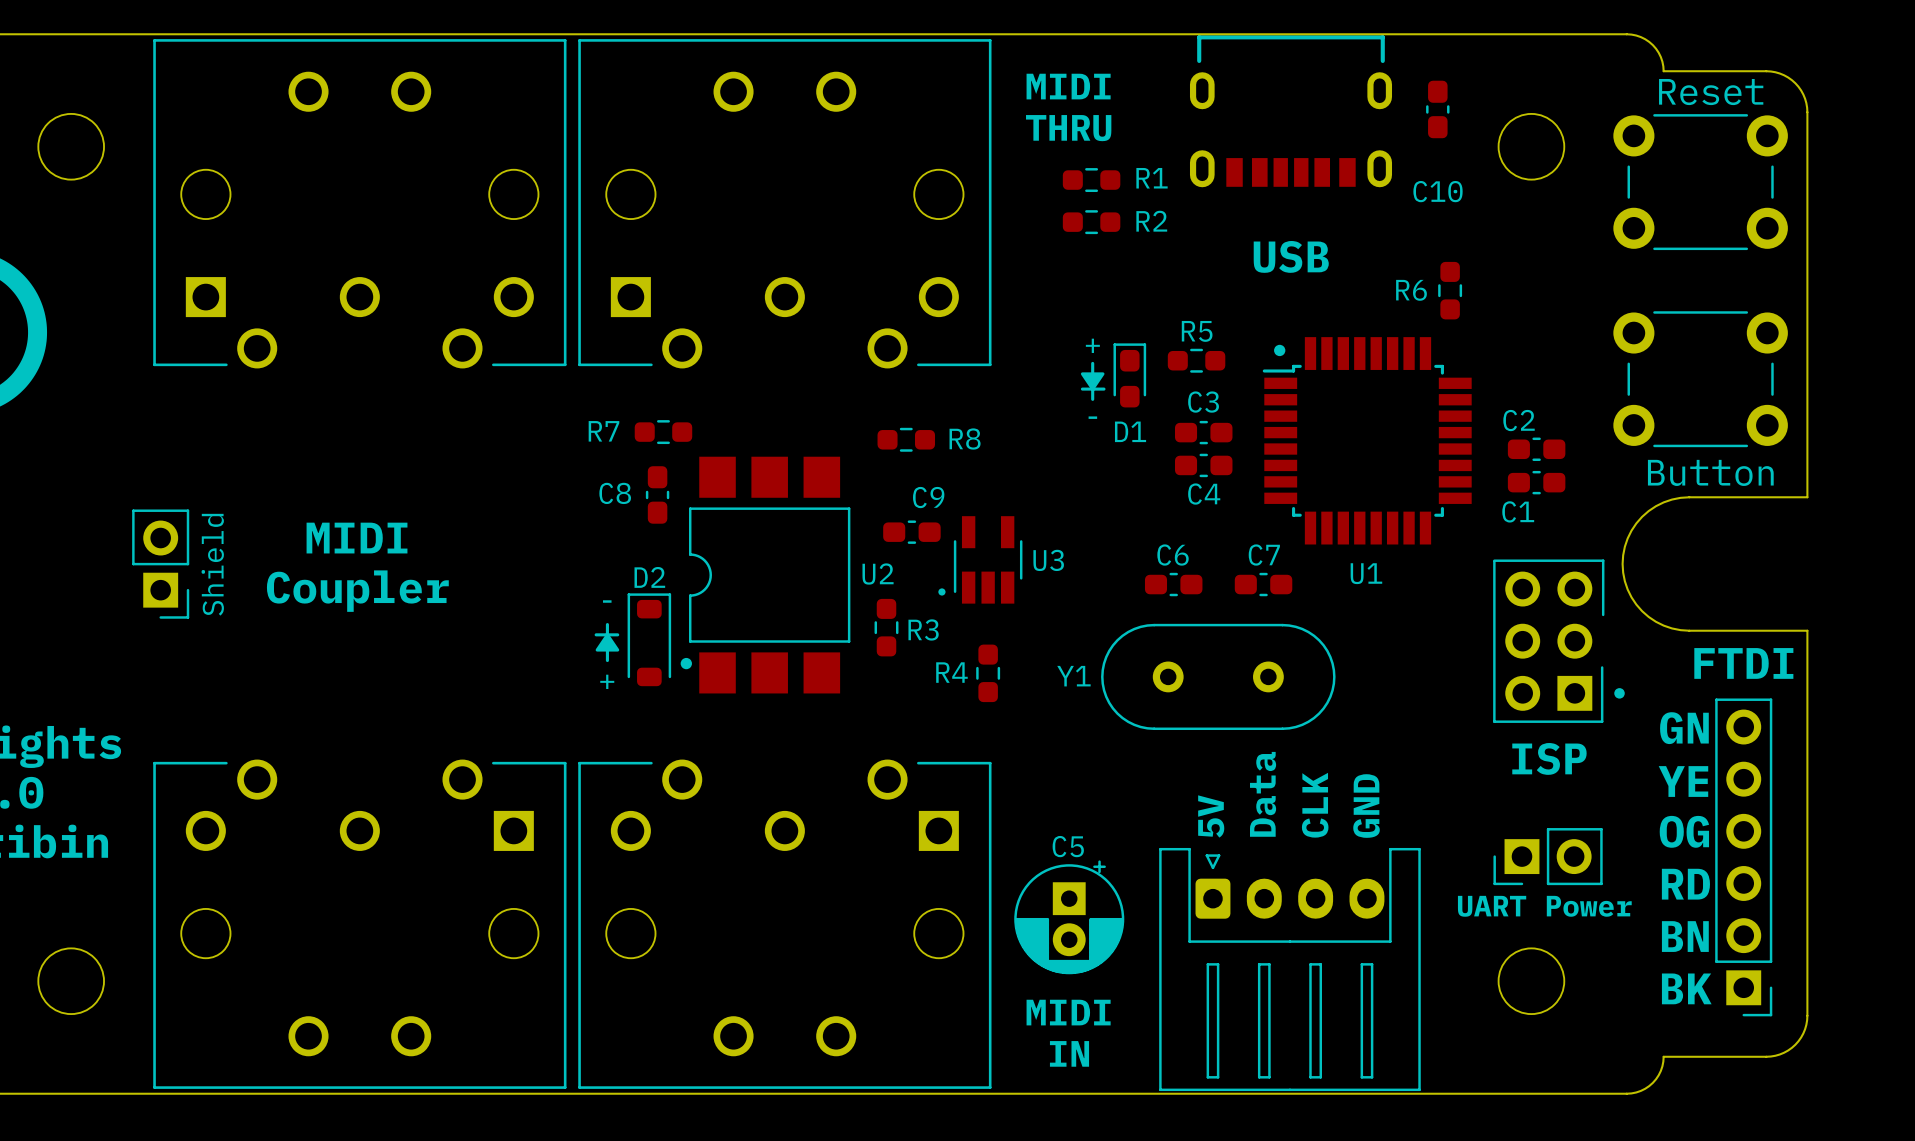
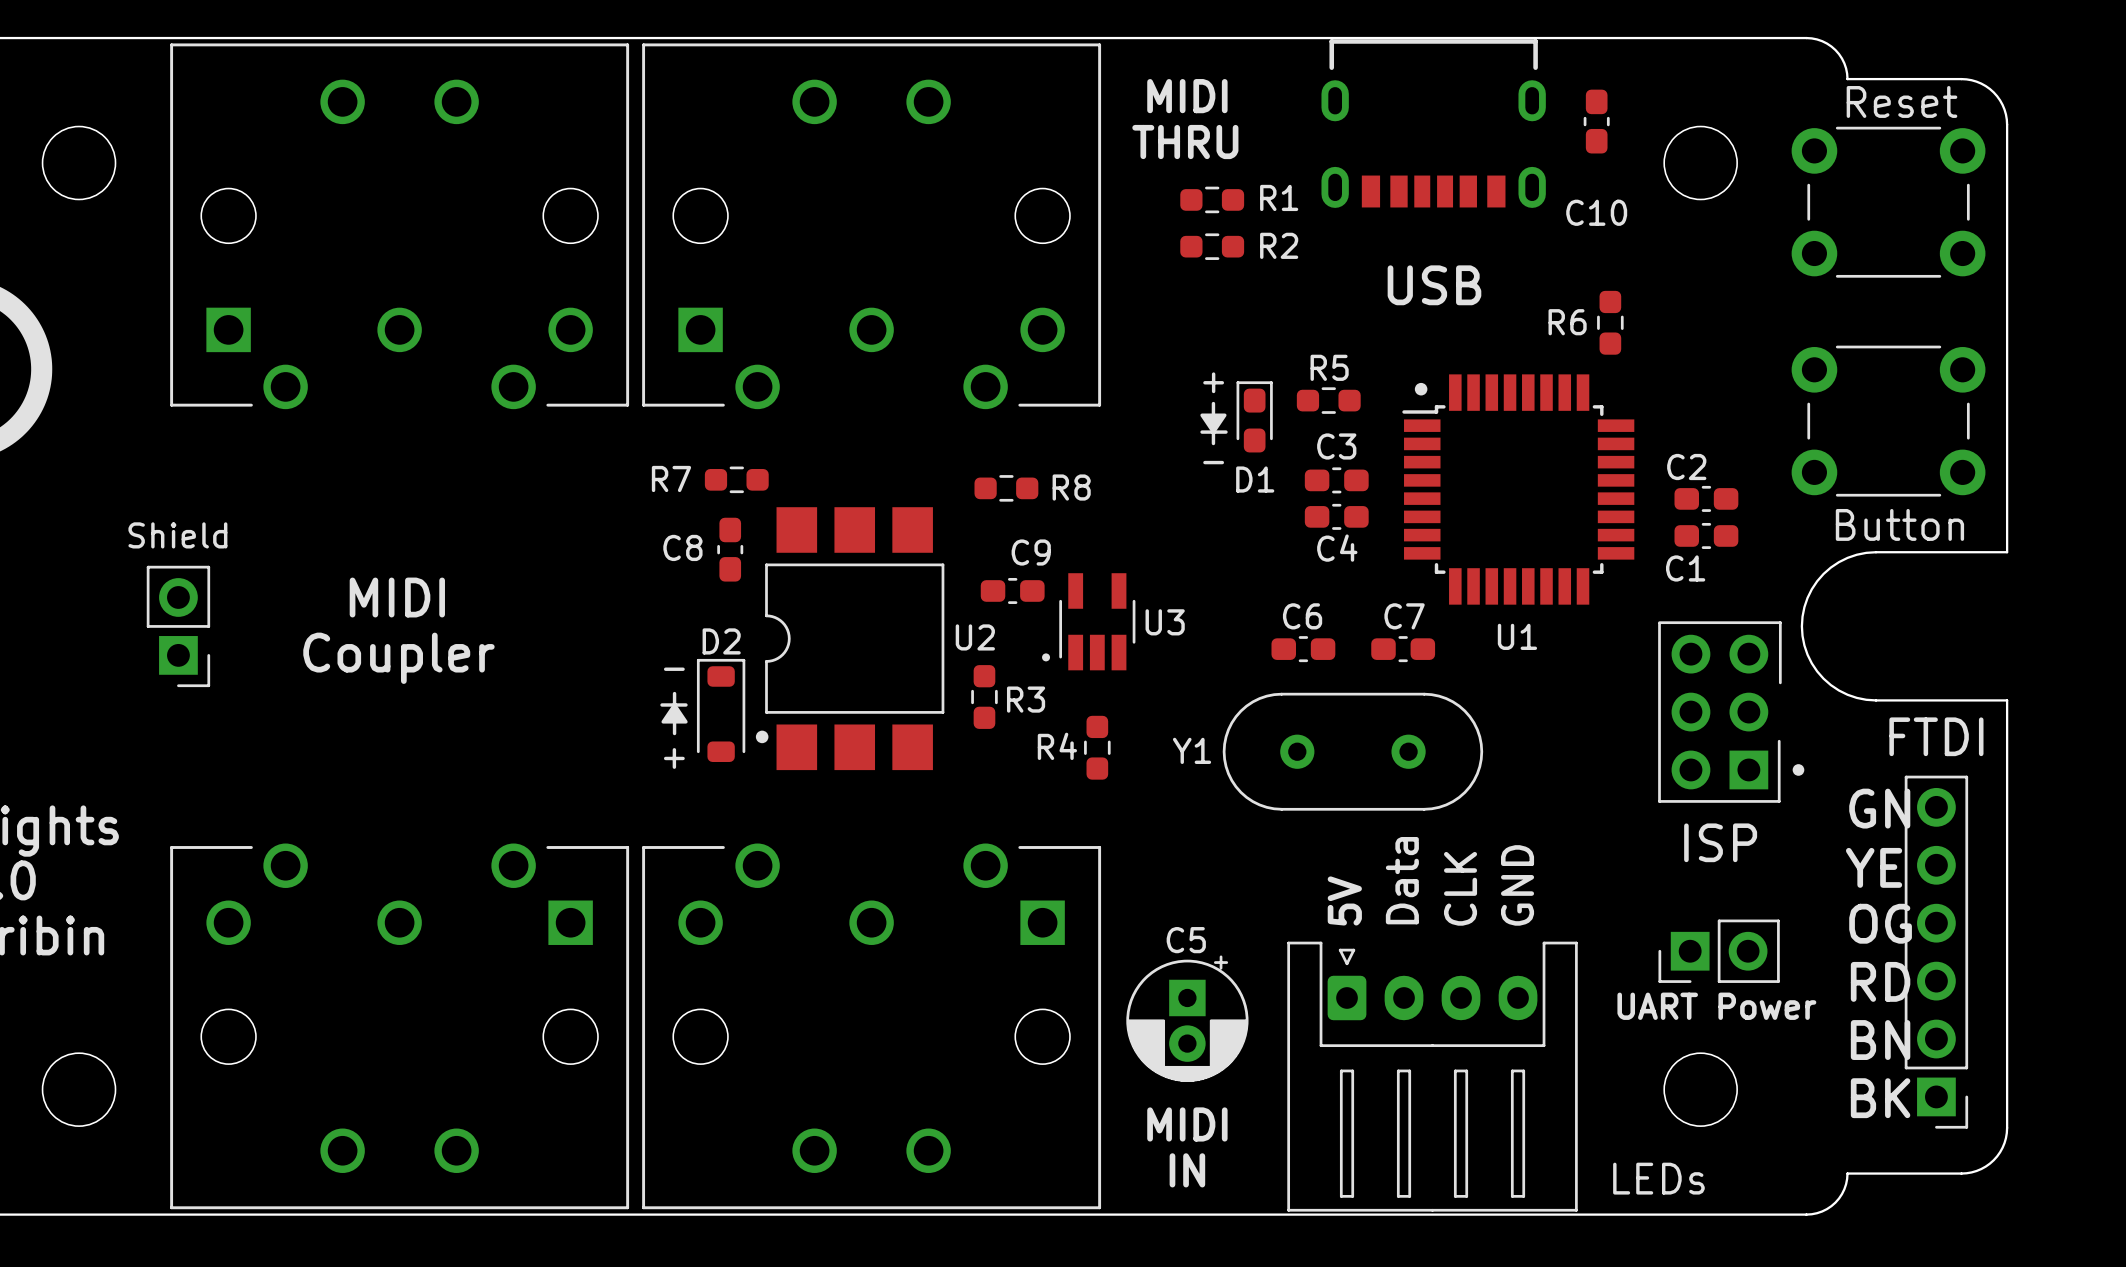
text rotation: 0° (212, 564) -> 90° clockwise (177, 535)
text: none -> LEDs (1658, 1178)

